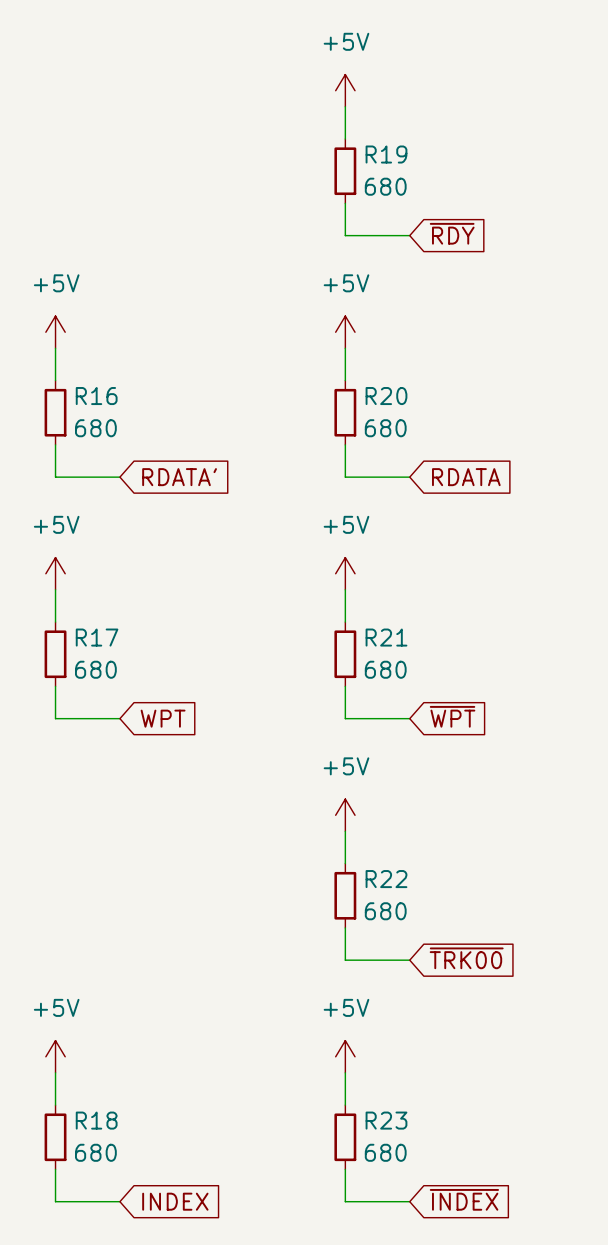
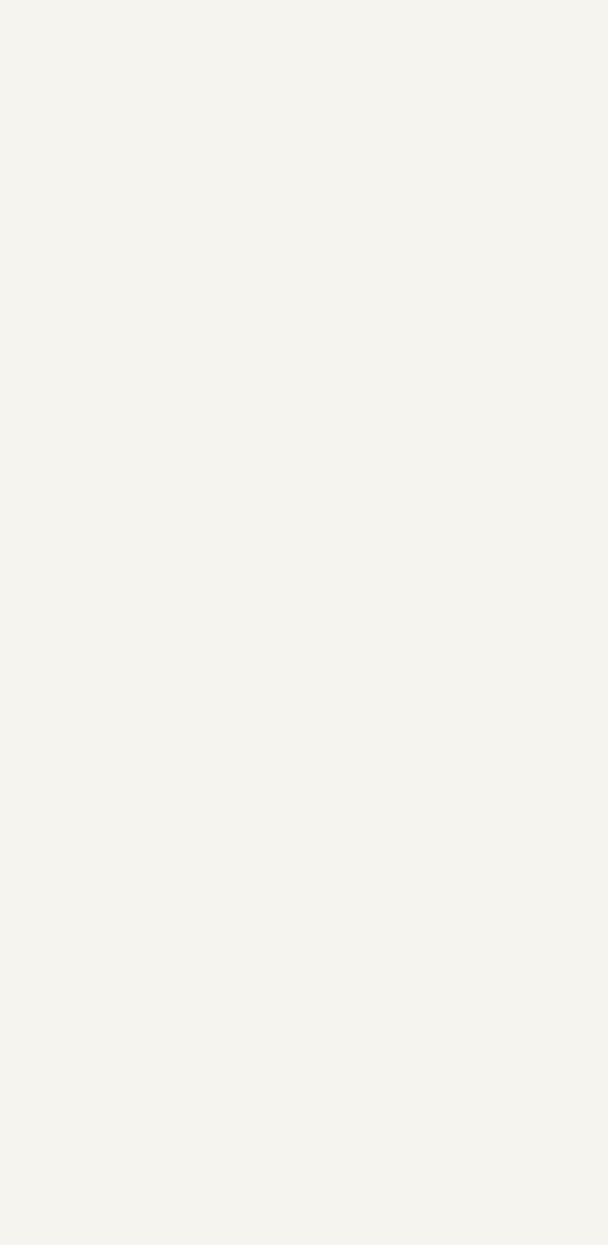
power symbol: +5V (345, 90) -> none
wire: (345, 106) (345, 139) -> none
R19: 680 (345, 171) -> none
wire: (345, 203) (345, 235) (409, 235) -> none
global label: ~{RDY} (452, 233) -> none
power symbol: +5V (55, 332) -> none
power symbol: +5V (345, 332) -> none
wire: (55, 348) (55, 380) -> none
wire: (345, 348) (345, 380) -> none
R16: 680 (55, 412) -> none
R20: 680 (345, 412) -> none
wire: (55, 444) (55, 477) (119, 477) -> none
wire: (345, 444) (345, 477) (409, 477) -> none
global label: RDATA' (179, 477) -> none
global label: RDATA (466, 477) -> none
power symbol: +5V (55, 573) -> none
power symbol: +5V (345, 573) -> none
wire: (55, 589) (55, 622) -> none
wire: (345, 589) (345, 622) -> none
R17: 680 (55, 654) -> none
R21: 680 (345, 654) -> none
wire: (55, 686) (55, 718) (119, 718) -> none
wire: (345, 686) (345, 718) (409, 718) -> none
global label: ~{WPT} (452, 716) -> none
global label: WPT (163, 718) -> none
power symbol: +5V (345, 815) -> none
wire: (345, 831) (345, 863) -> none
R22: 680 (345, 895) -> none
wire: (345, 927) (345, 960) (409, 960) -> none
global label: ~{TRK00} (466, 958) -> none
power symbol: +5V (55, 1056) -> none
power symbol: +5V (345, 1056) -> none
wire: (55, 1072) (55, 1105) -> none
wire: (345, 1072) (345, 1105) -> none
R18: 680 (55, 1137) -> none
R23: 680 (345, 1137) -> none
wire: (55, 1169) (55, 1201) (119, 1201) -> none
wire: (345, 1169) (345, 1201) (409, 1201) -> none
global label: ~{INDEX} (464, 1199) -> none
global label: INDEX (175, 1201) -> none

